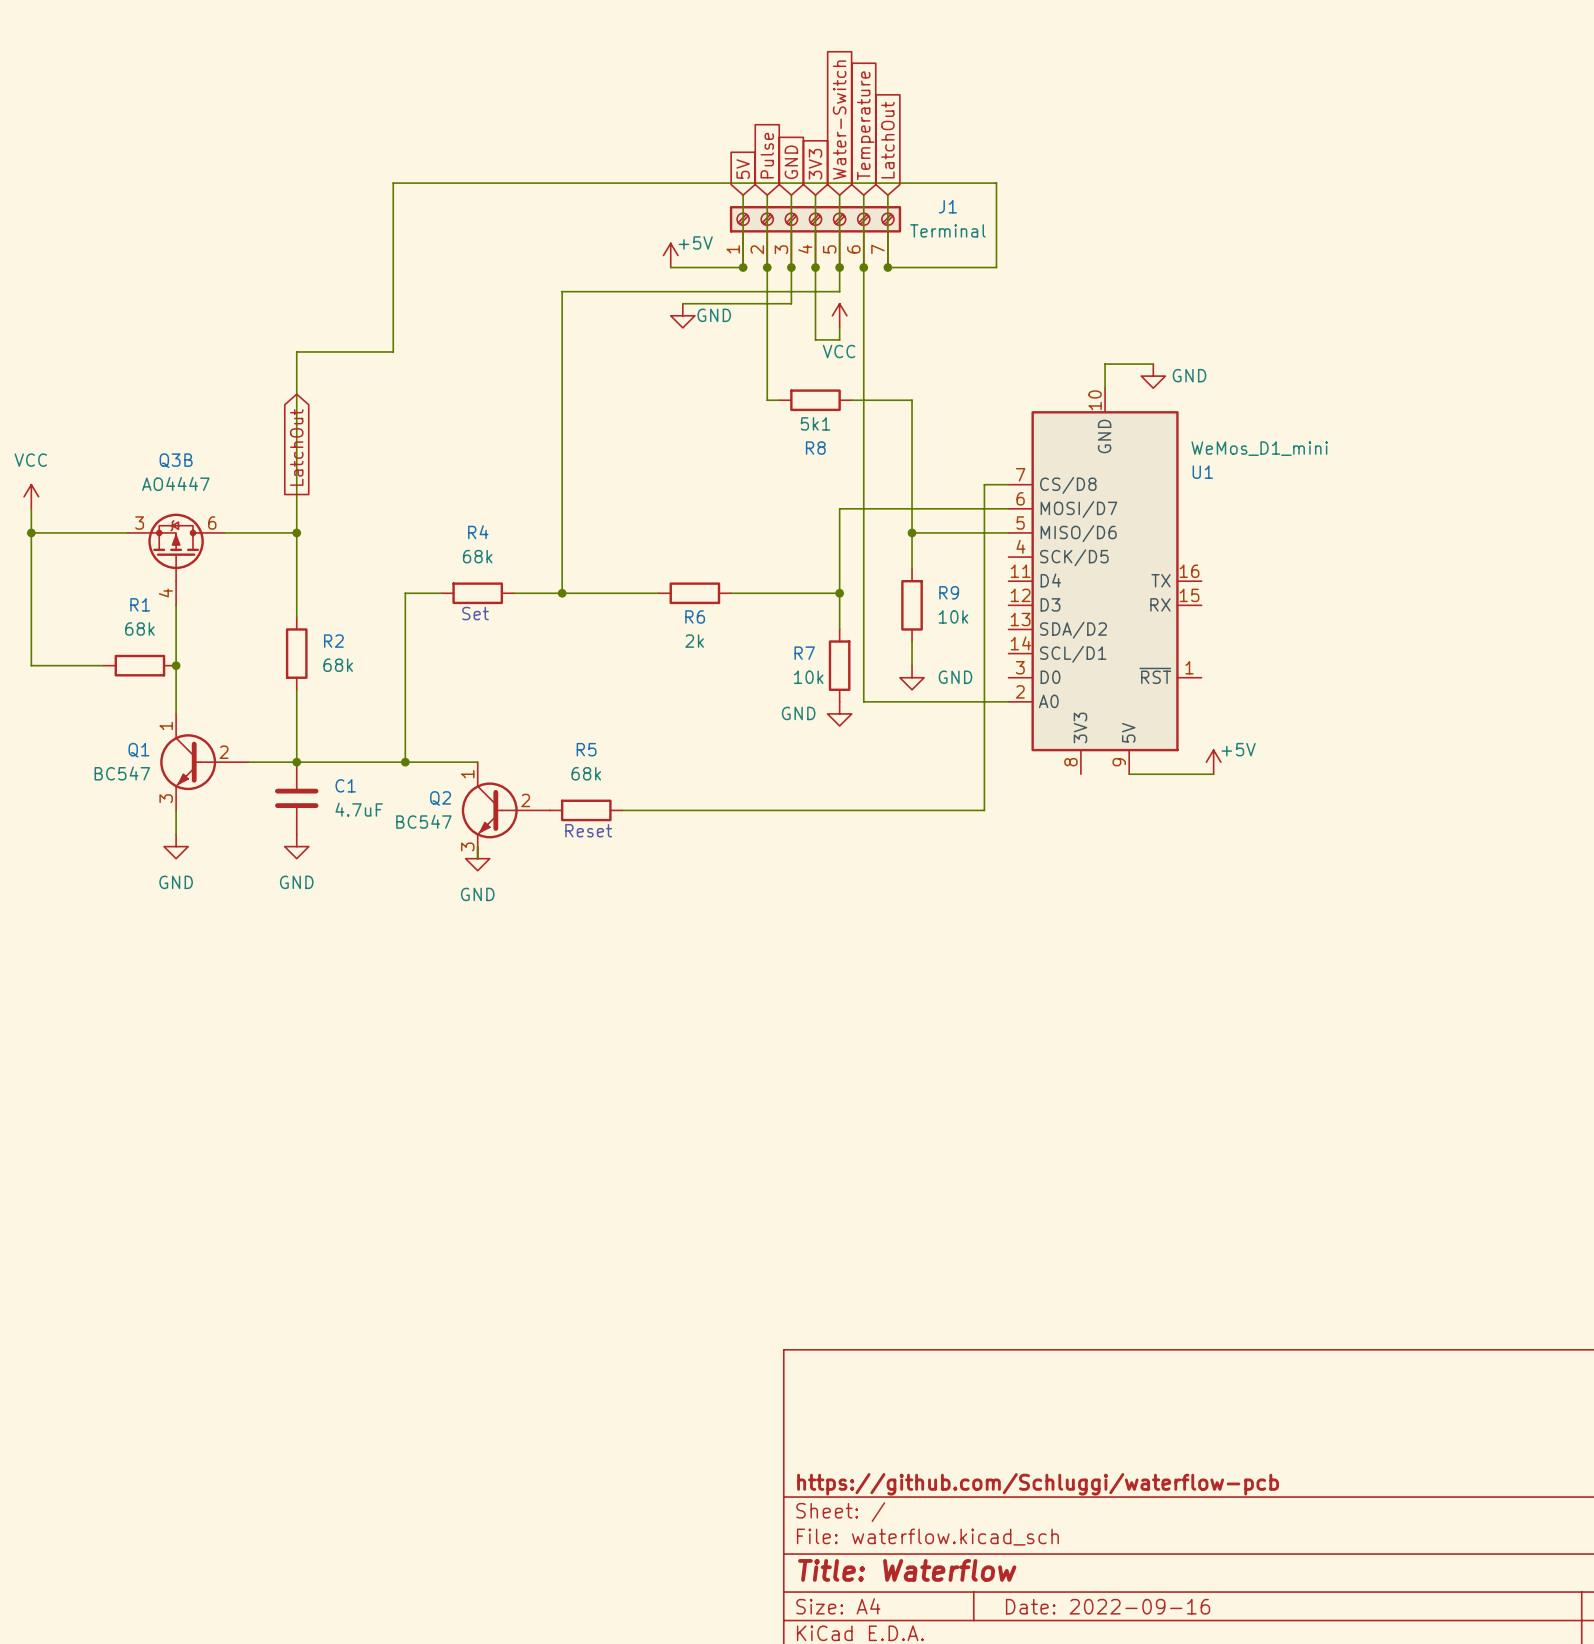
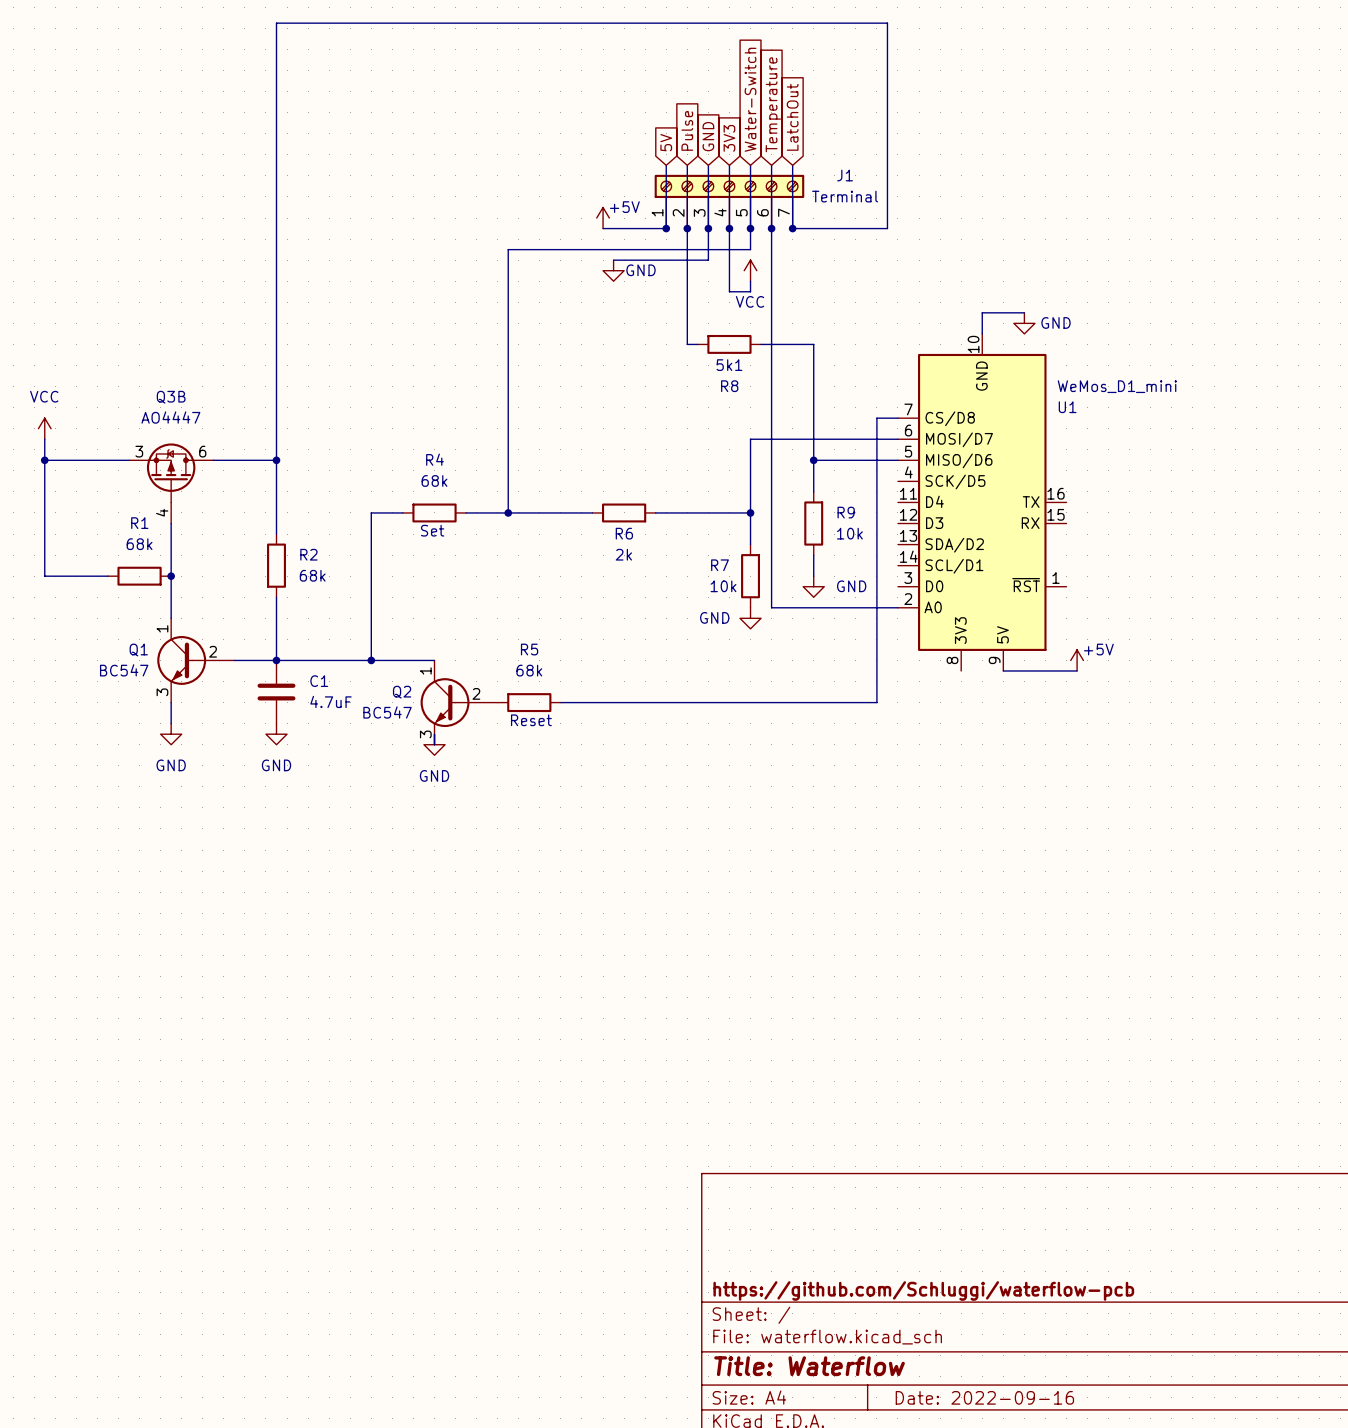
wire: (996, 183) (393, 183) (393, 351) (296, 351) -> (887, 154) (887, 23) (276, 23) (276, 302)
global label: LatchOut (296, 447) -> none

